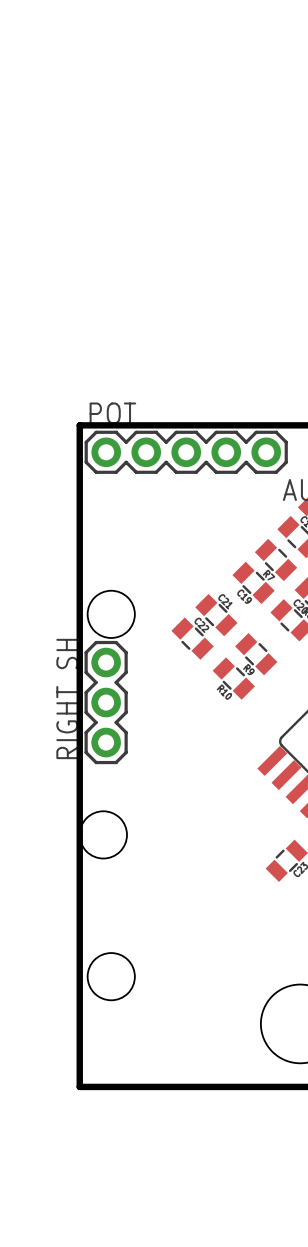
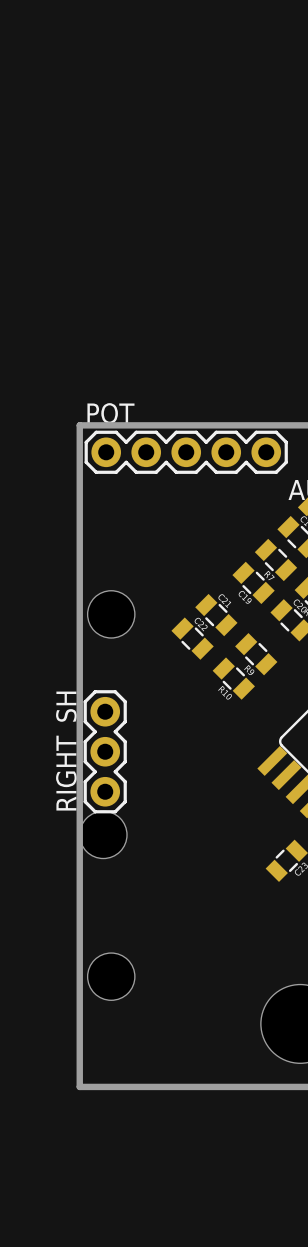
RIGHT_SH position: (106, 702) -> (105, 751)

